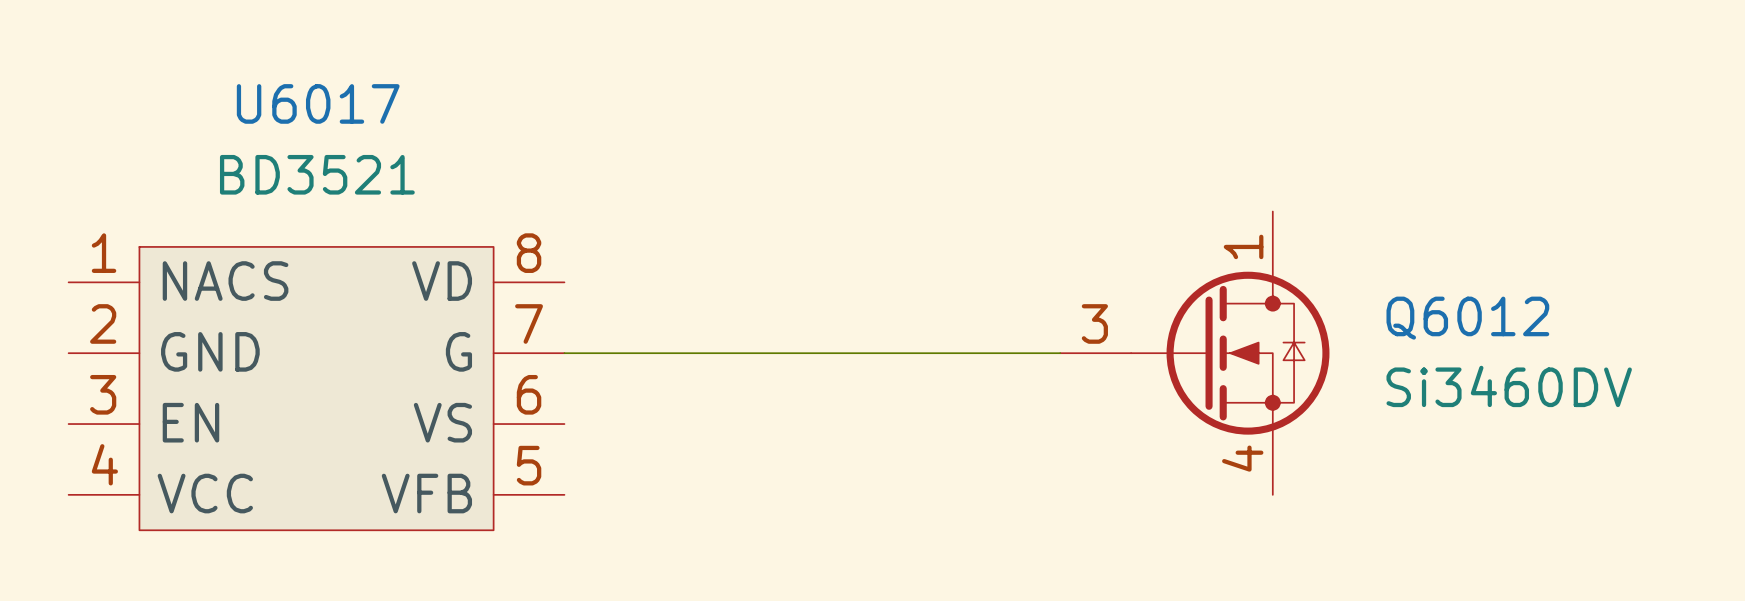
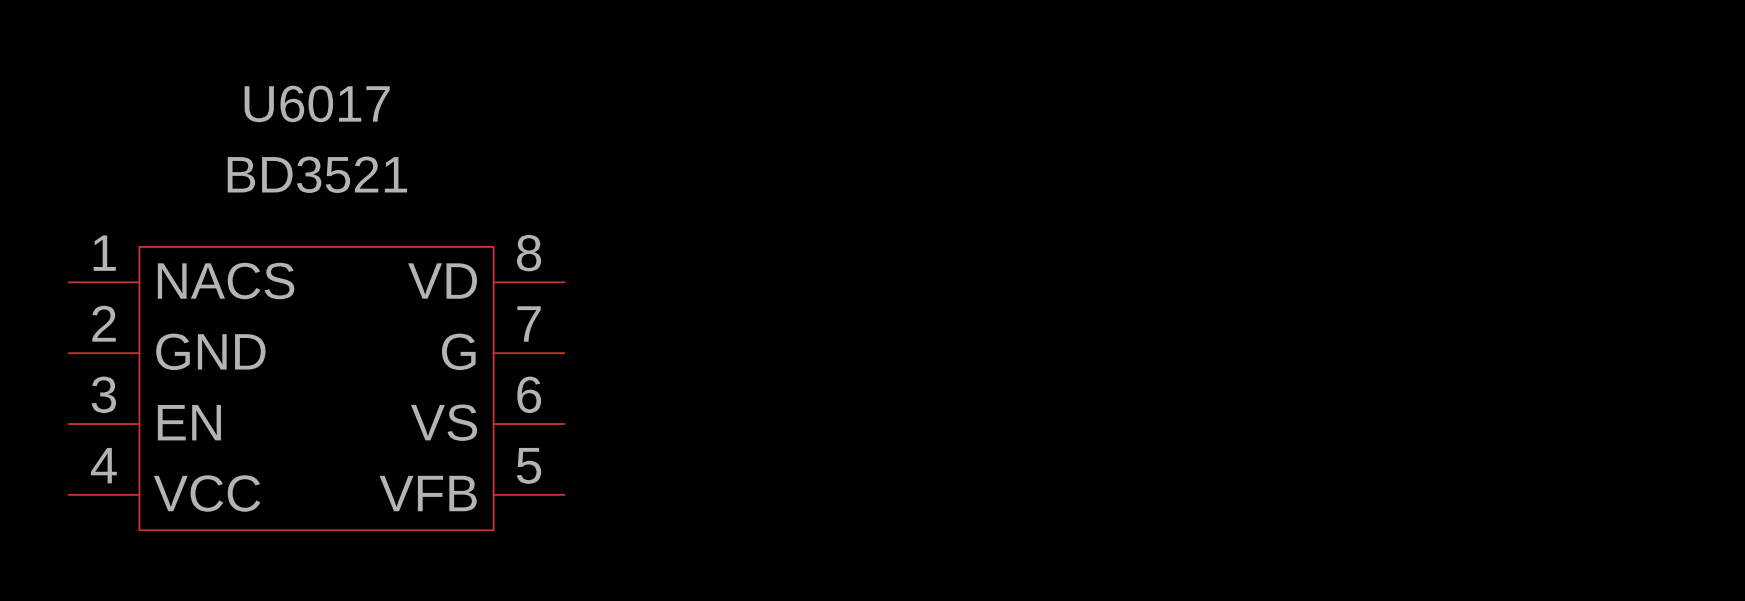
wire: (564, 353) (1060, 353) -> none
Q6012: Si3460DV (1194, 353) -> none

